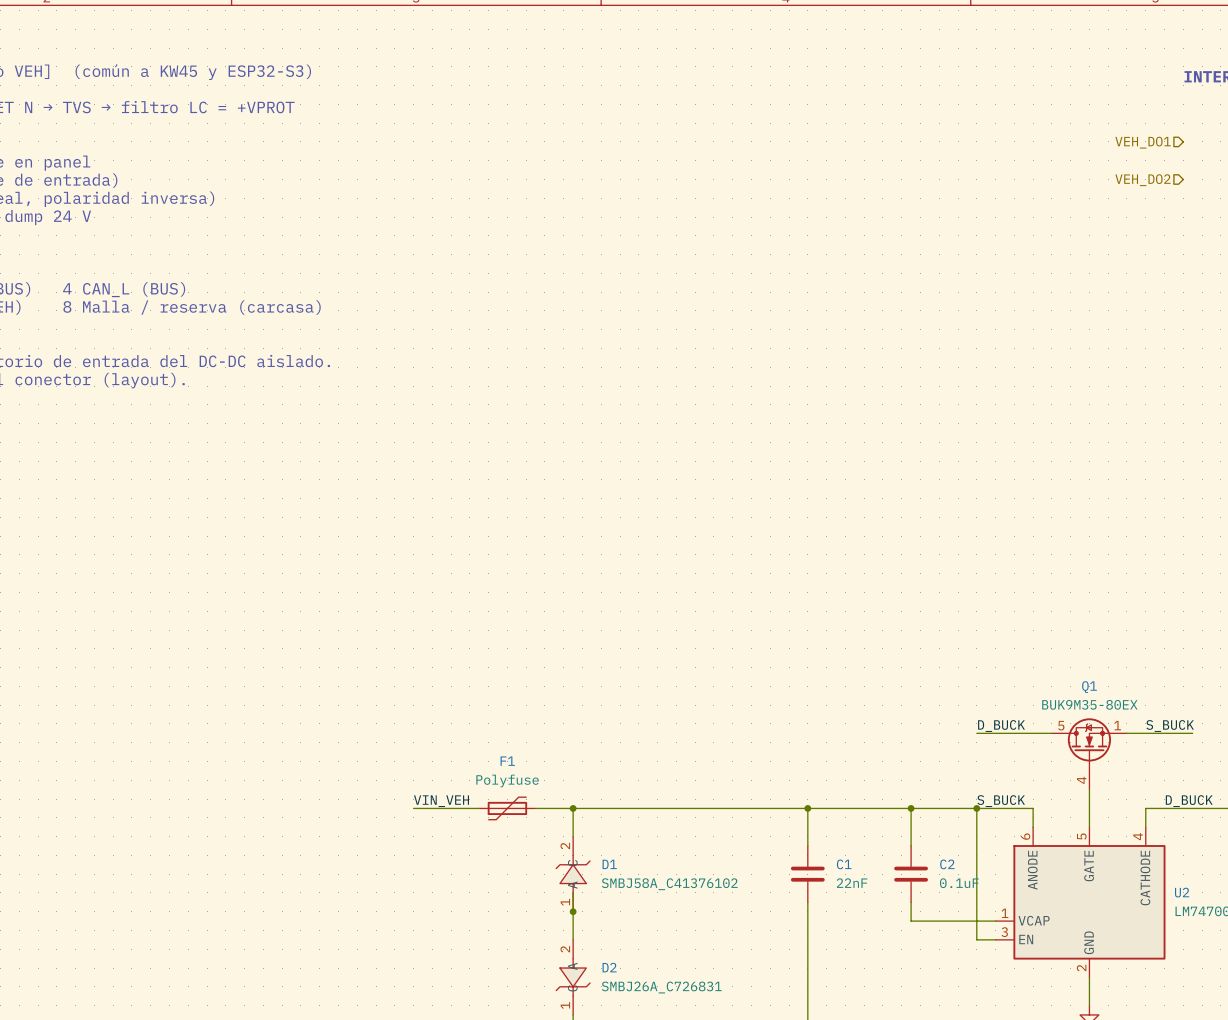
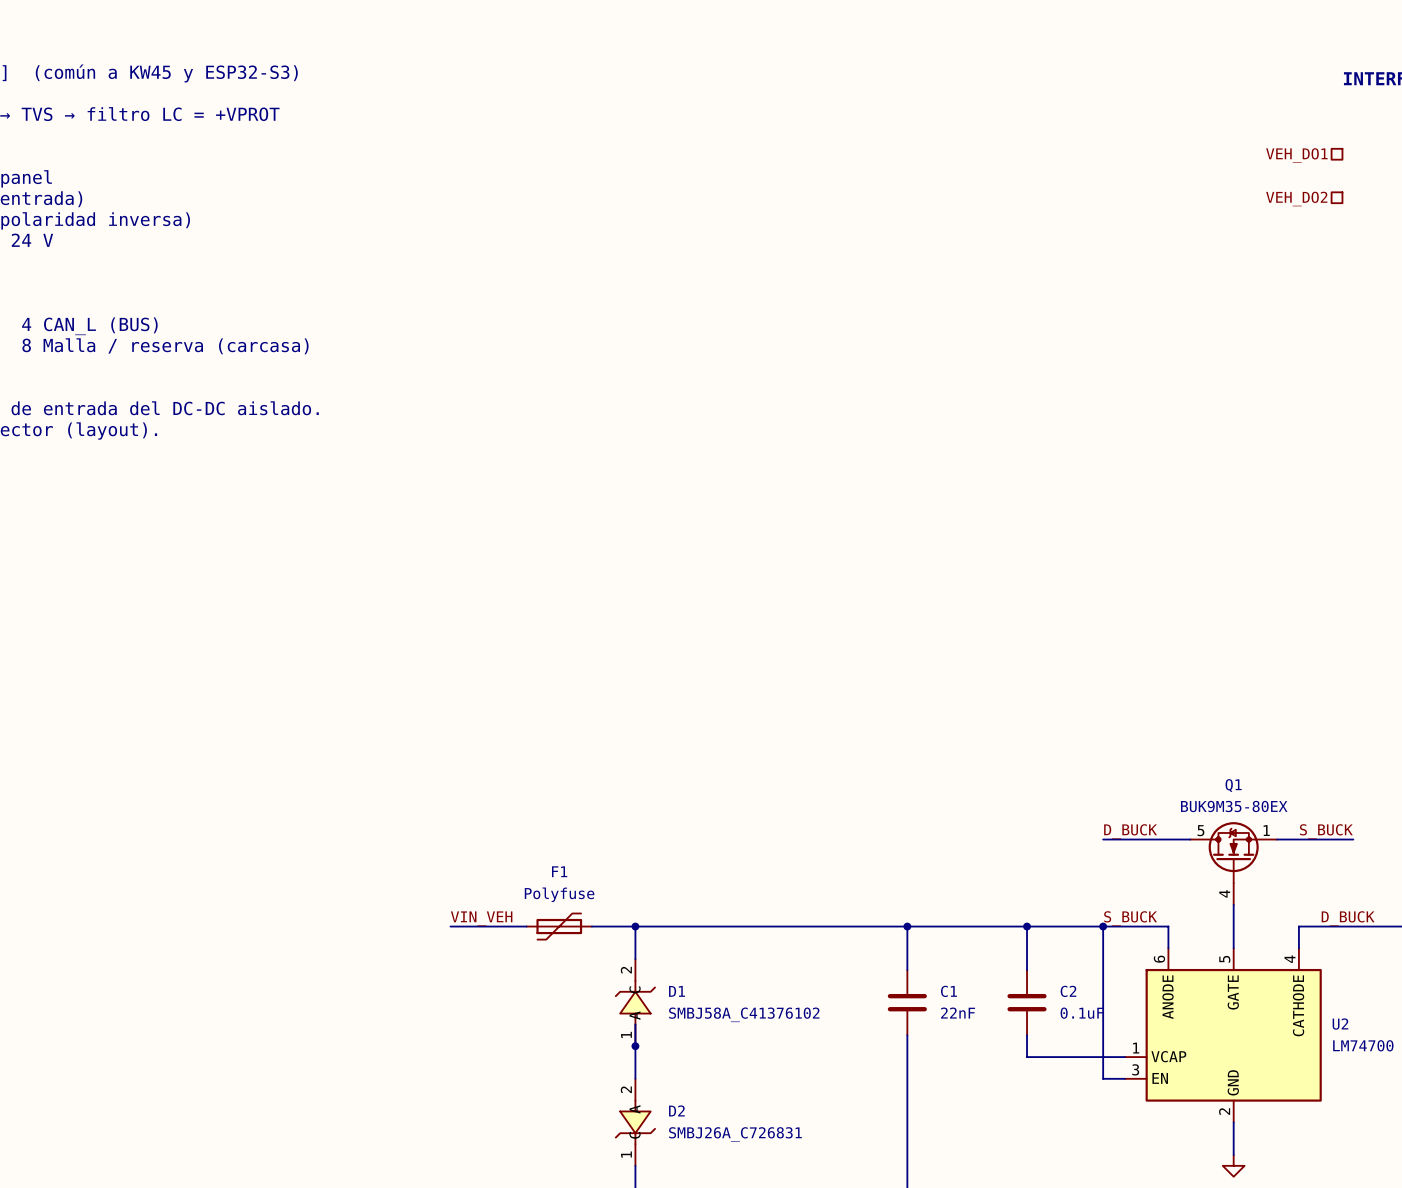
hierarchical label shape: input (1143, 142) -> passive (1296, 155)
hierarchical label shape: input (1142, 180) -> passive (1296, 199)

